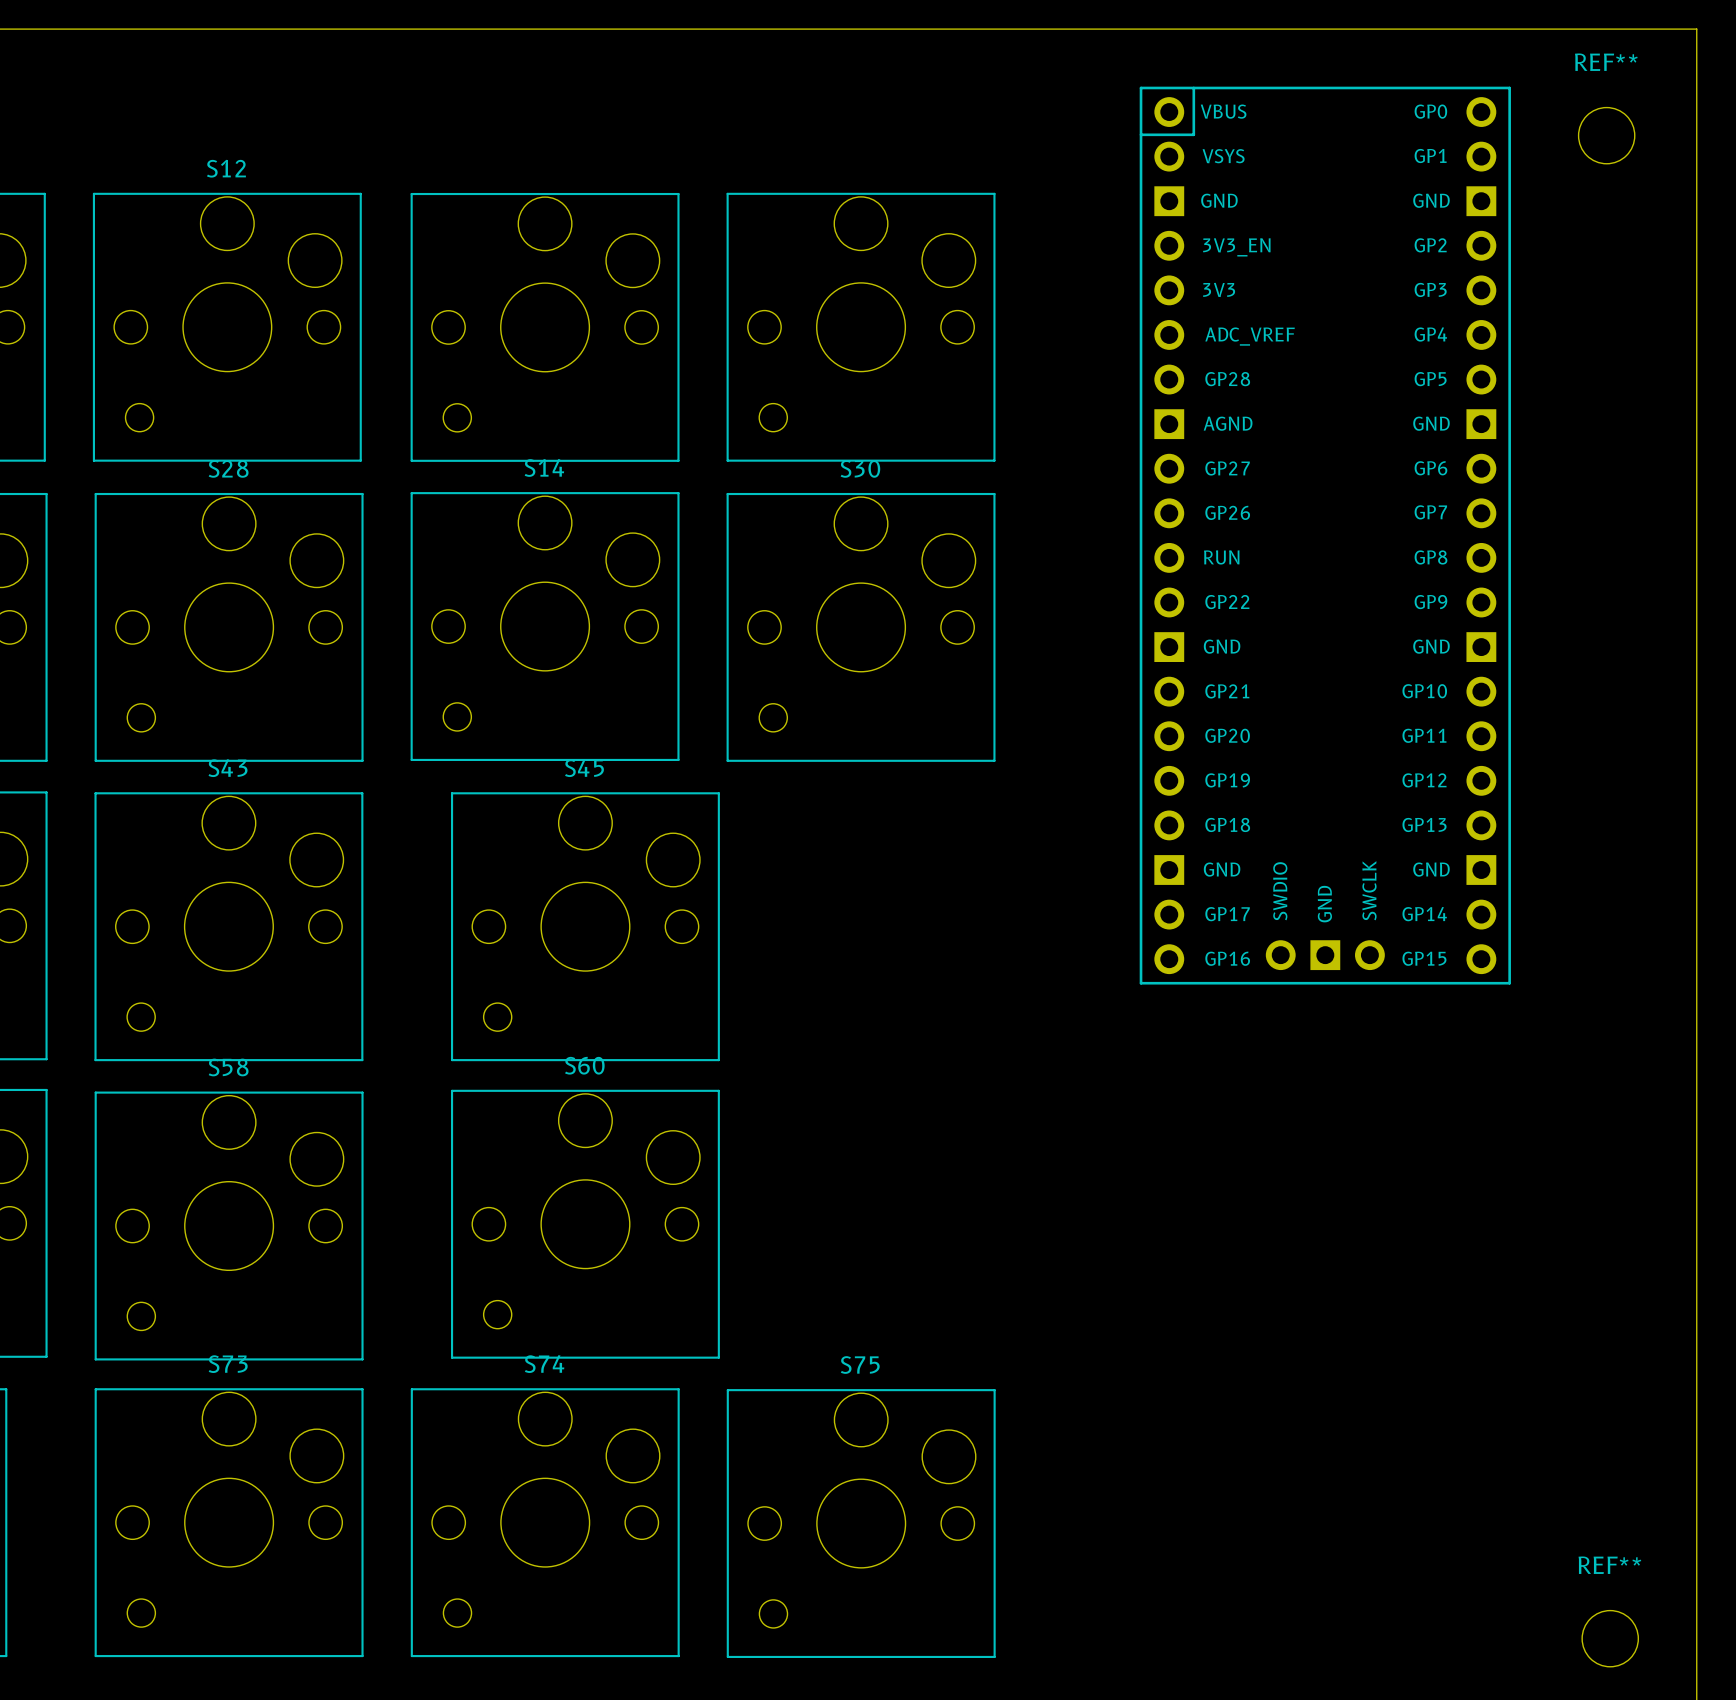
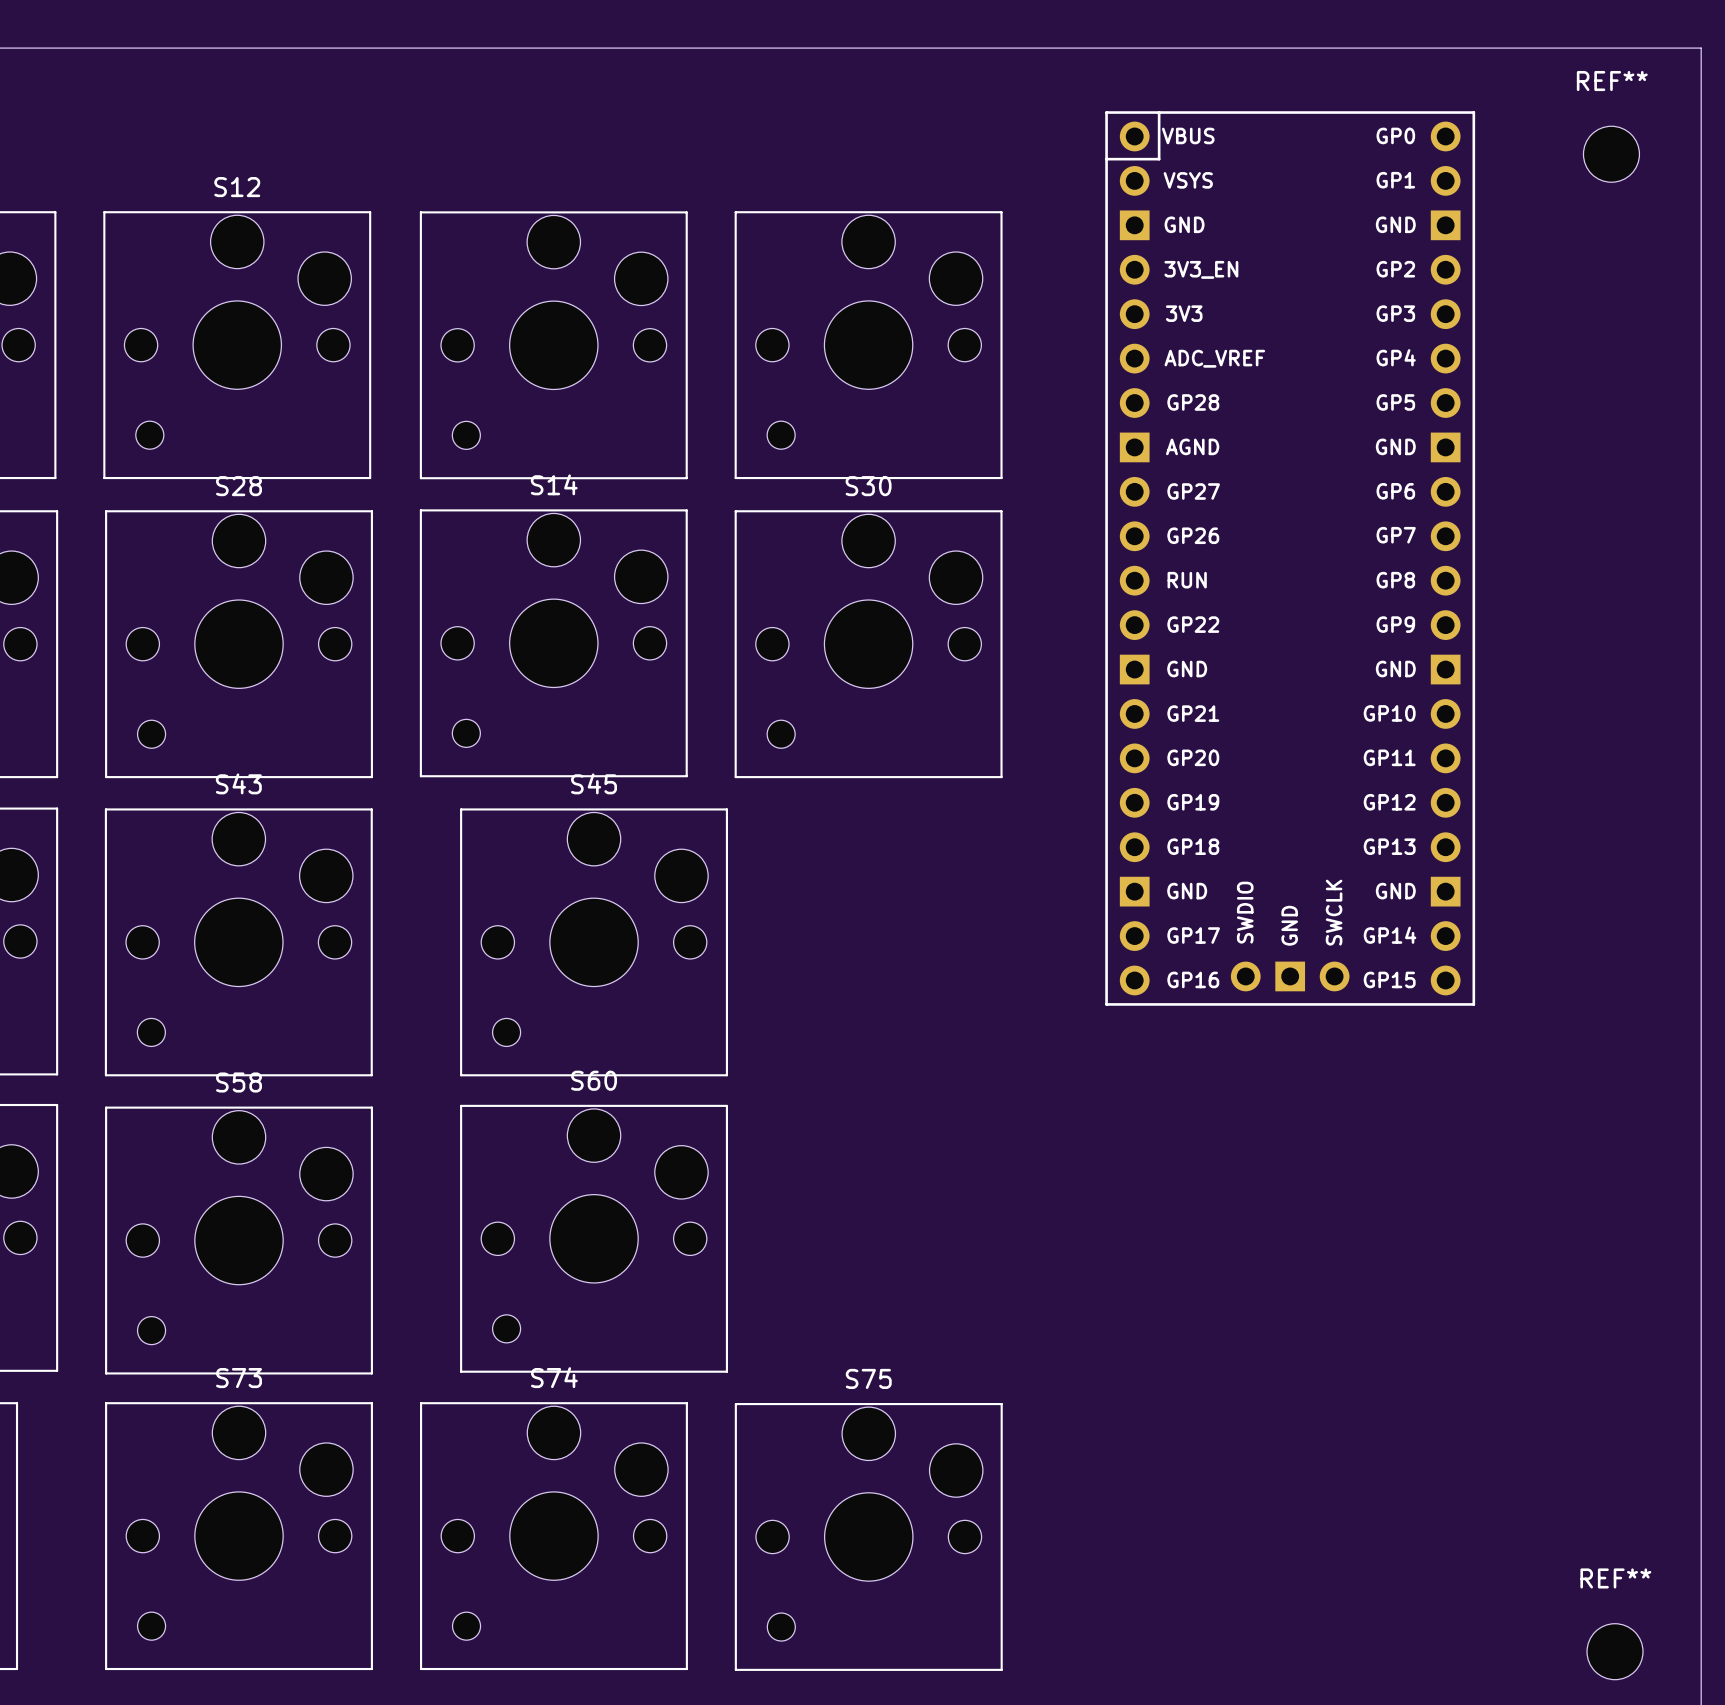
part position: (1325, 535) -> (1290, 558)

